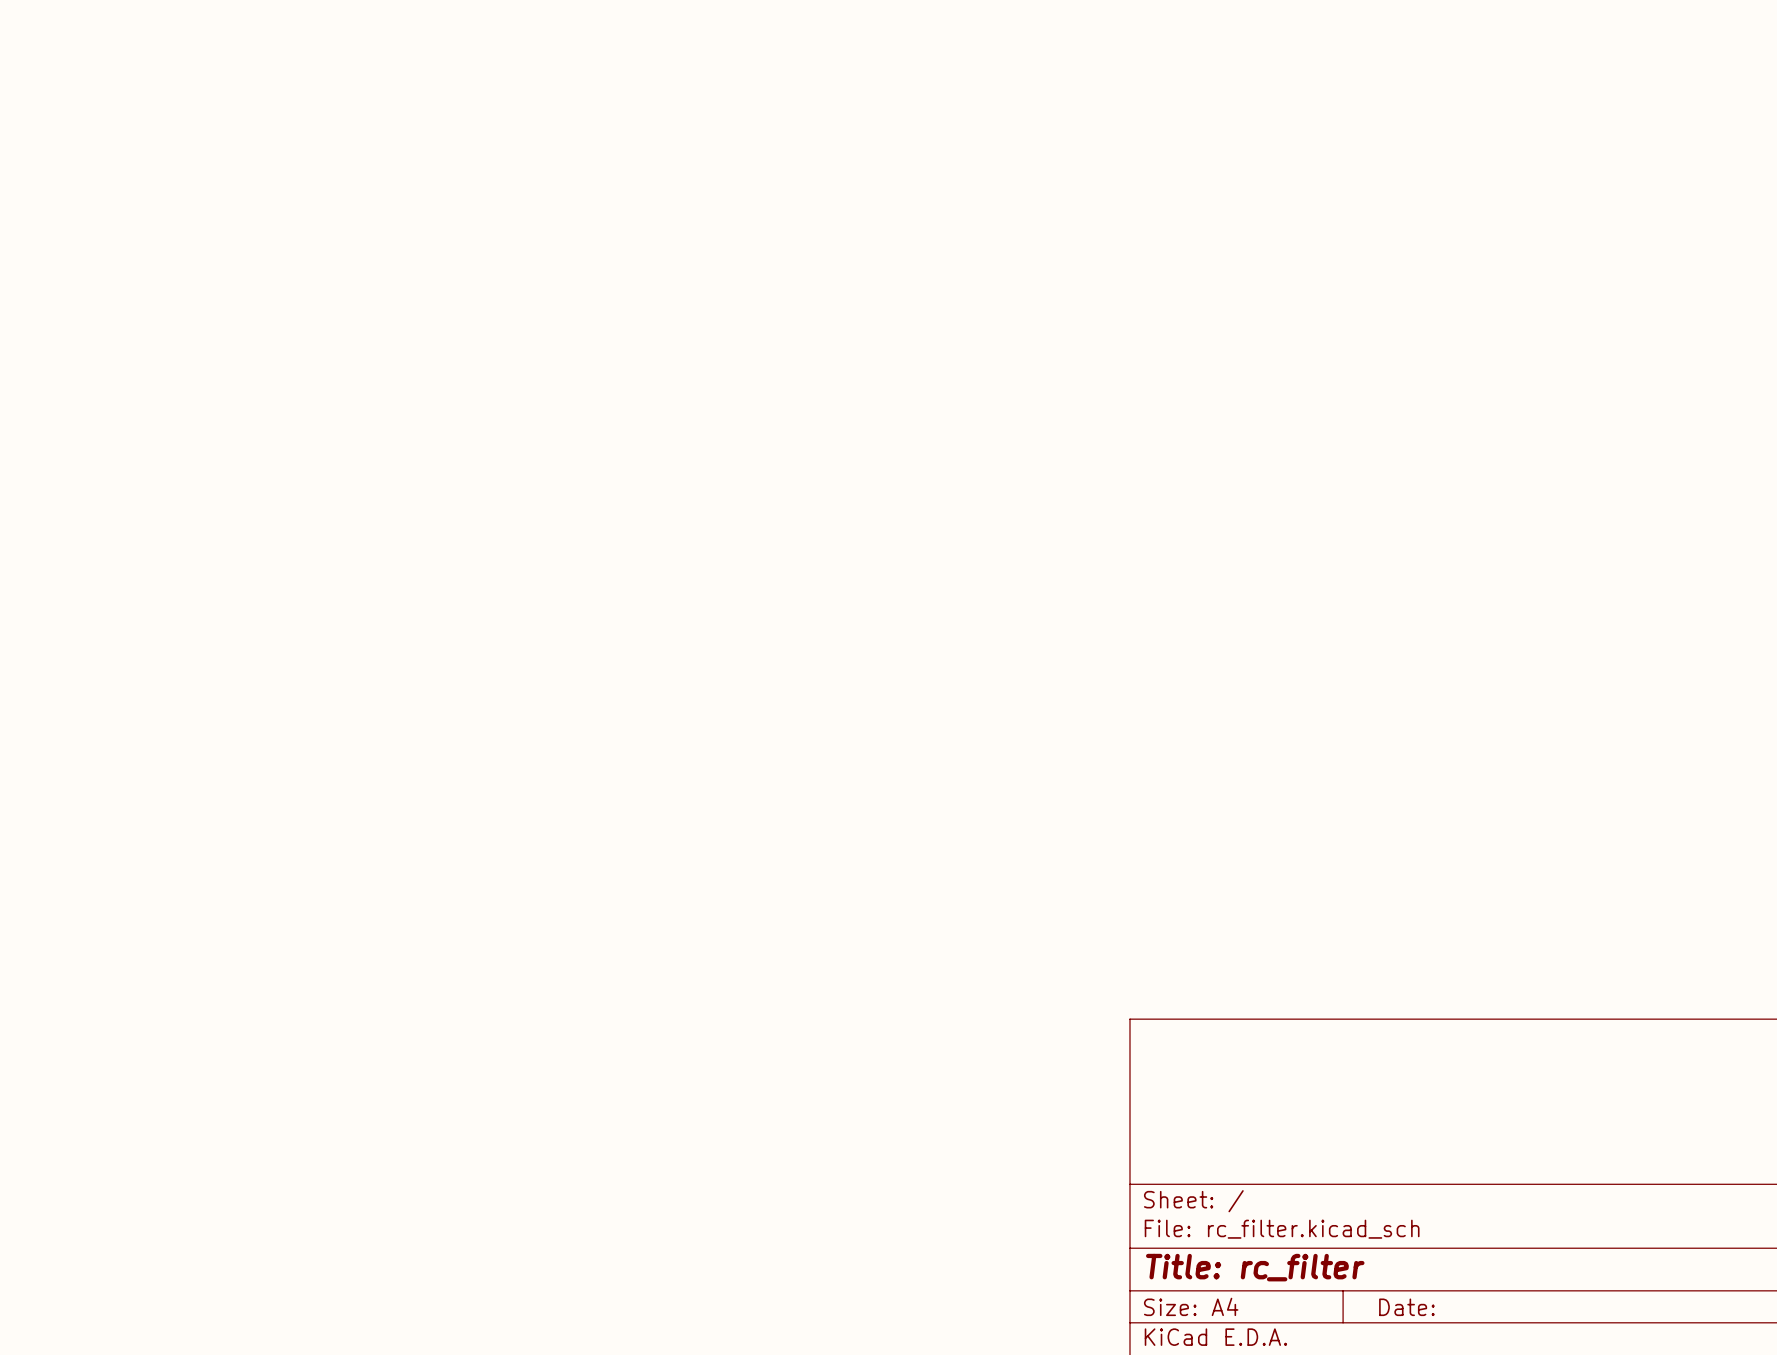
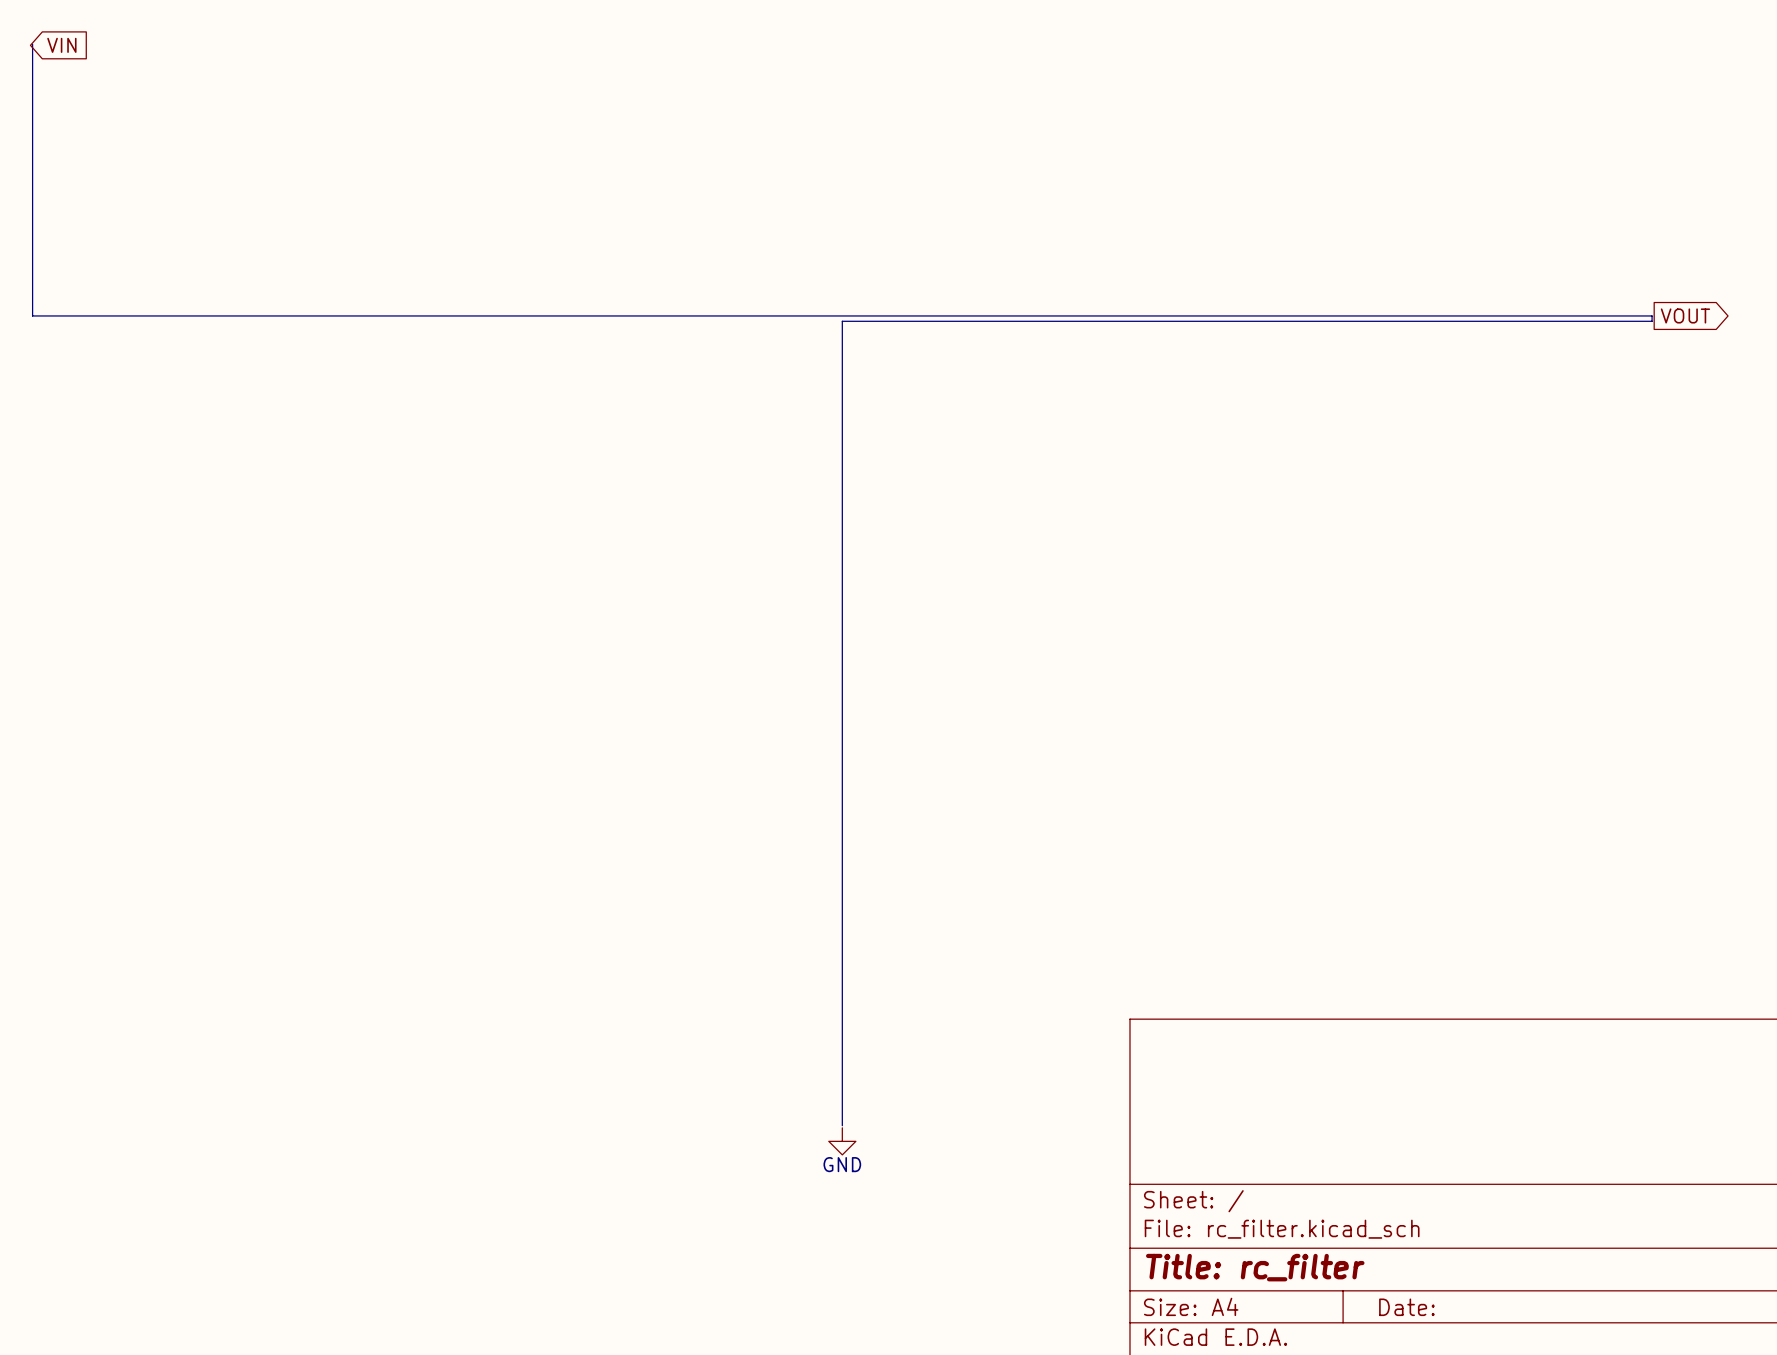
wire: none -> (32, 44) (32, 315) (1652, 315) (1652, 321) (842, 321) (842, 1125)
global label: none -> VIN (61, 45)
global label: none -> VOUT (1685, 315)
power symbol: none -> GND (842, 1141)

